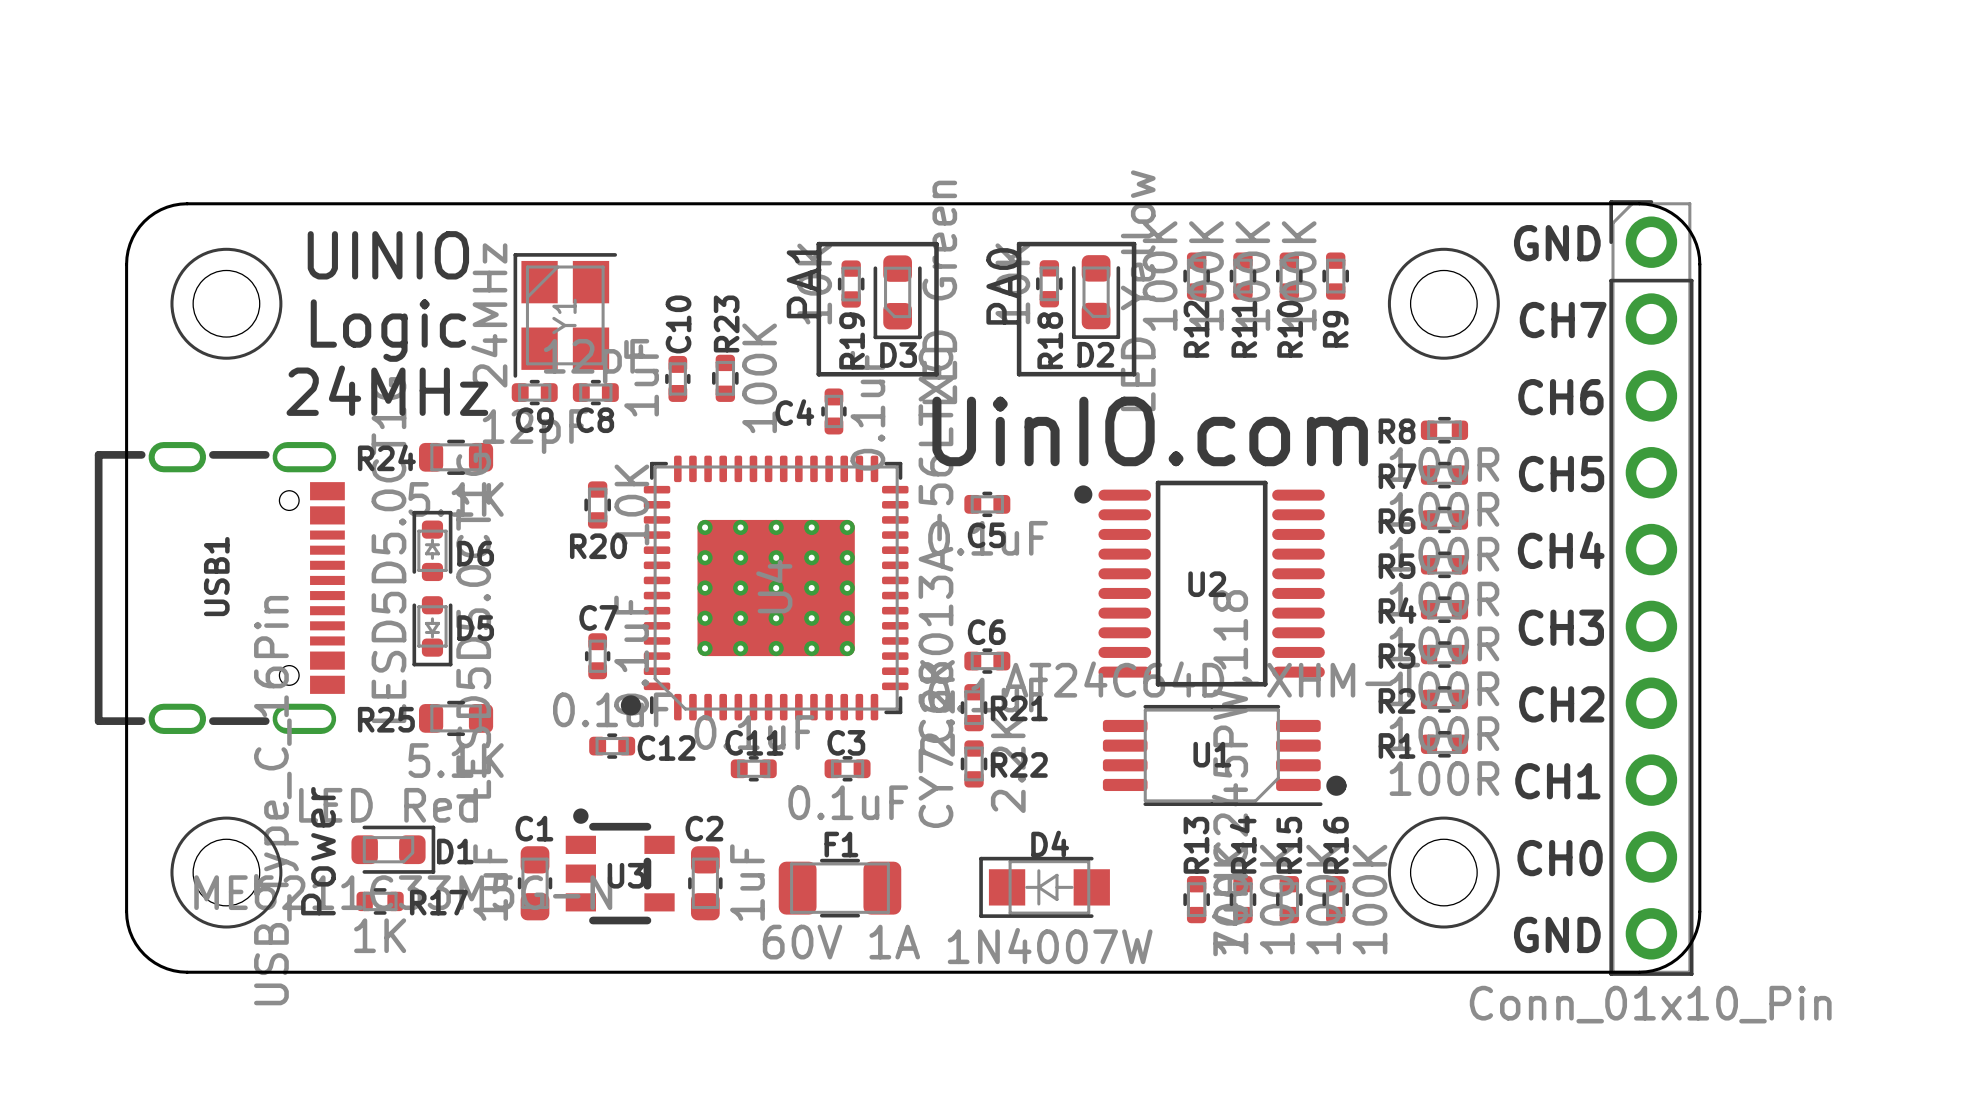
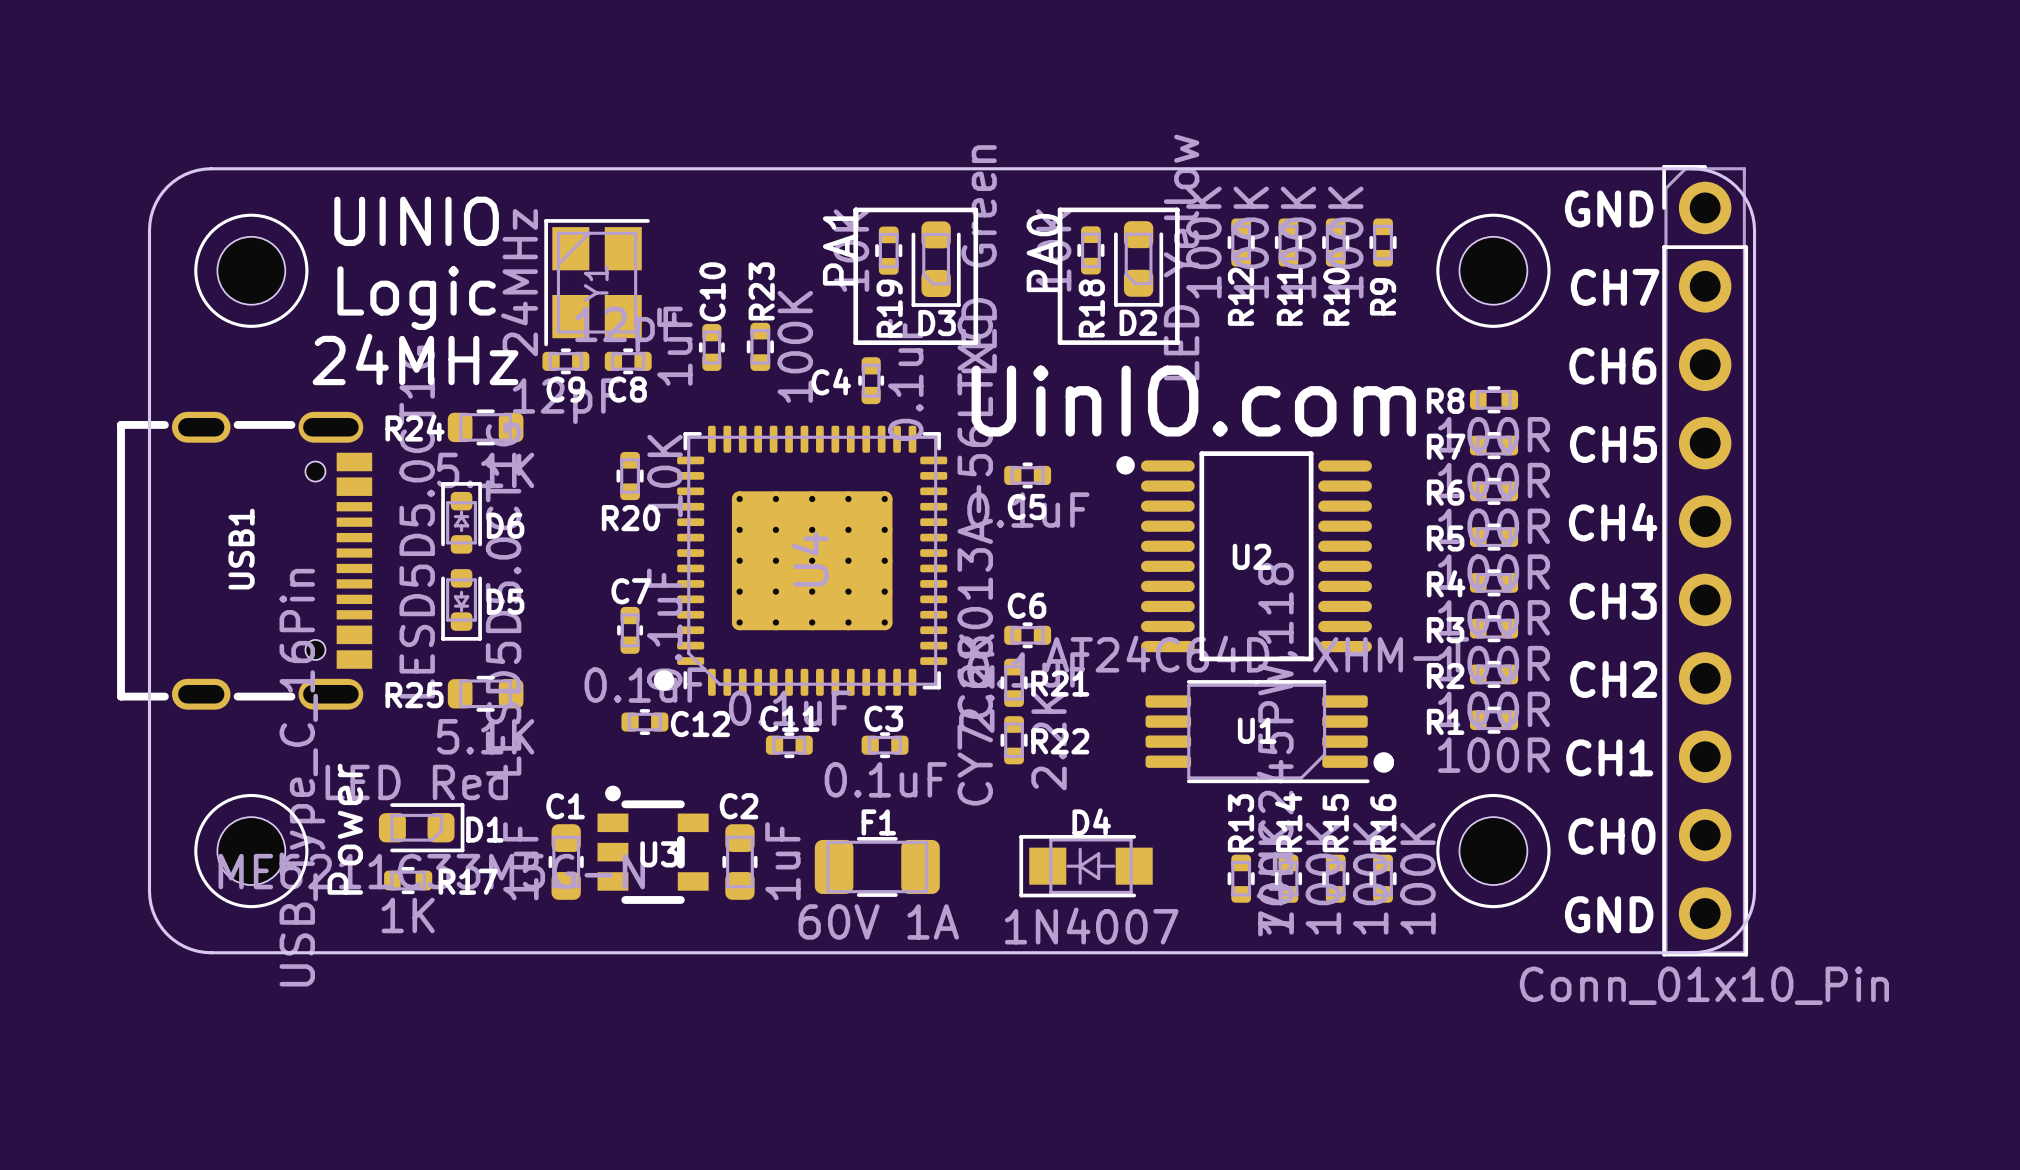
D4 value: 1N4007W (1050, 946) -> 1N4007 (1091, 926)

